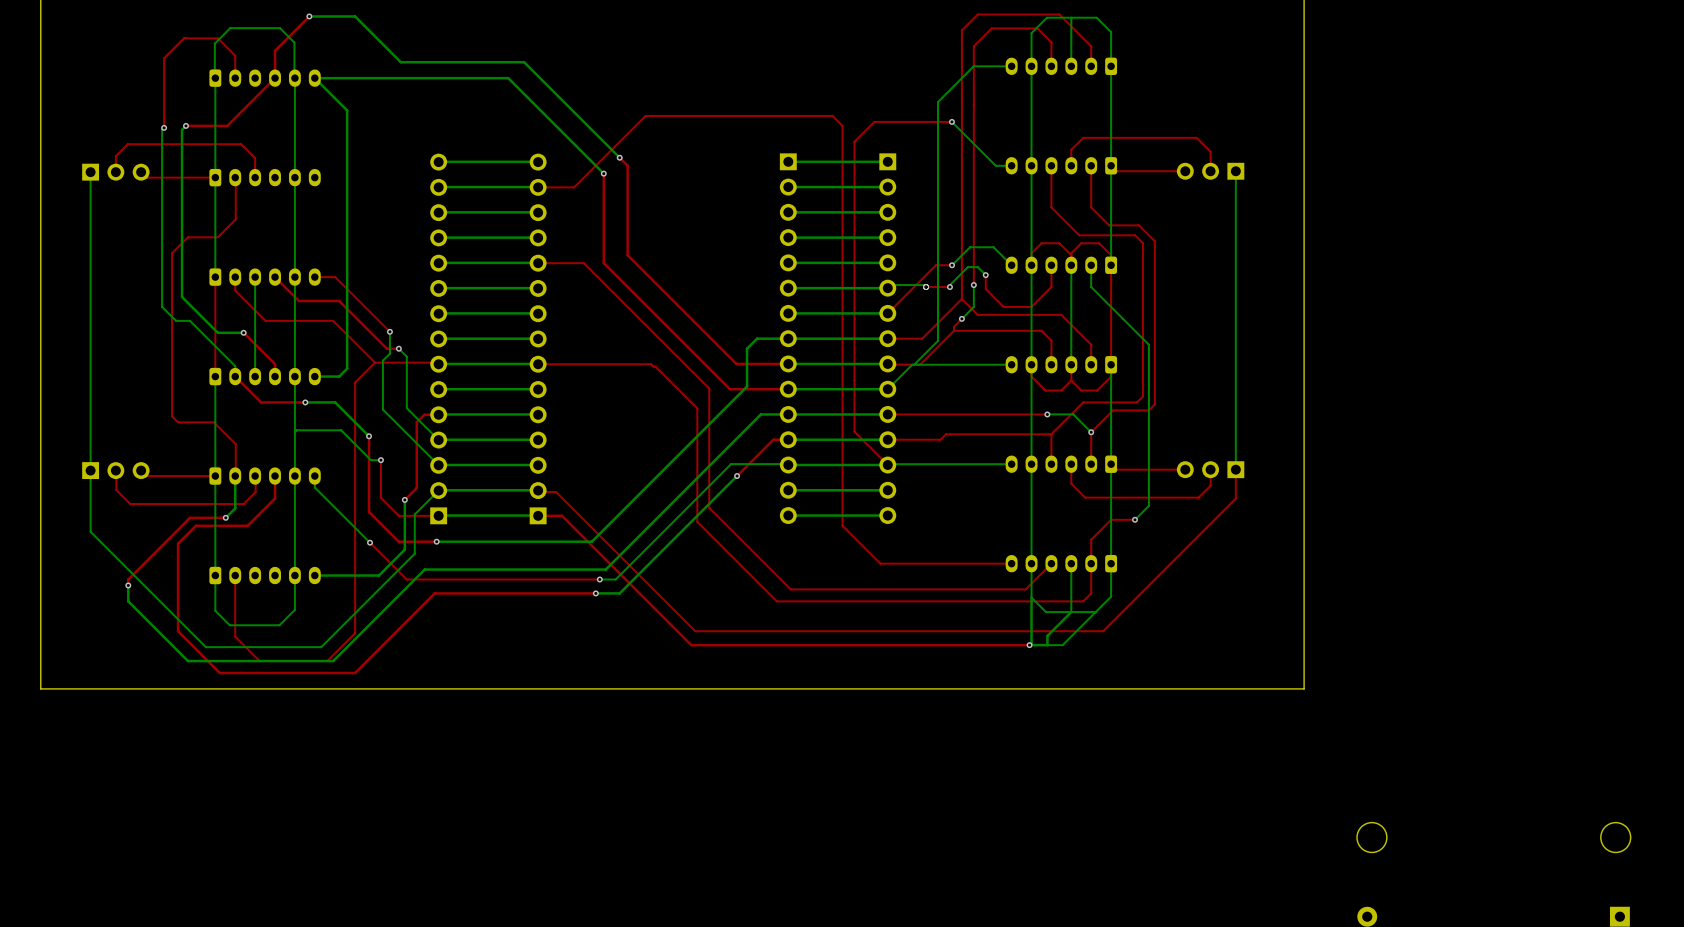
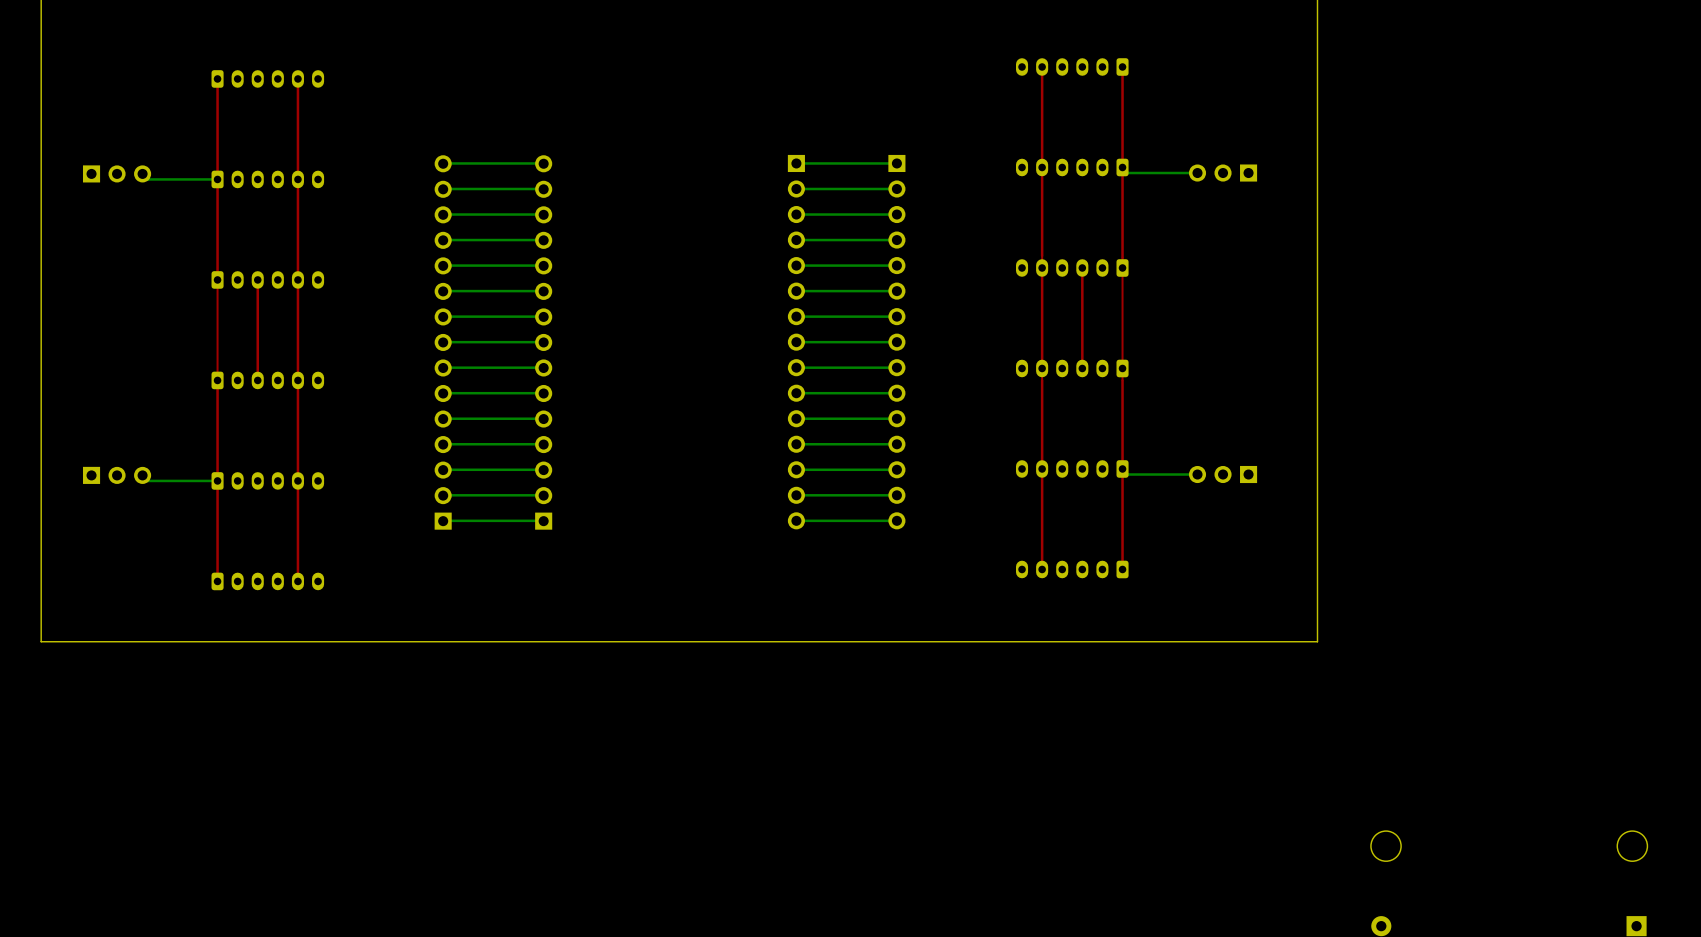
bottom track: (309, 16) (355, 16) (400, 62) (524, 62) (619, 157) -> none
top track: (309, 16) (275, 50) (275, 78) (227, 125) (186, 125) -> none
via: (309, 16) -> none
bottom track: (1071, 17) (1071, 66) -> none
bottom track: (1011, 66) (973, 66) (938, 102) (938, 340) (914, 364) -> none
top track: (1051, 66) (1051, 42) (1037, 28) (991, 28) (973, 46) (973, 285) -> none
top track: (1091, 66) (1091, 46) (1059, 14) (977, 14) (961, 30) (961, 298) -> none
bottom track: (294, 77) (294, 42) (280, 28) (230, 28) (214, 43) (214, 77) -> none
bottom track: (215, 78) (215, 277) -> none
top track: none -> (217, 78) (217, 279)
top track: (235, 78) (235, 55) (217, 38) (184, 38) (164, 58) (164, 127) -> none
bottom track: (294, 78) (294, 609) (279, 625) (229, 625) (215, 610) (215, 376) -> none
top track: none -> (297, 78) (297, 581)
bottom track: (951, 121) (995, 165) (1011, 165) -> none
top track: (951, 121) (874, 121) (854, 141) (854, 431) (887, 465) -> none
via: (951, 121) -> none
bottom track: (186, 125) (182, 129) (182, 296) (217, 332) (243, 332) -> none
via: (186, 125) -> none
bottom track: (164, 127) (162, 129) (162, 306) (176, 320) (189, 320) (235, 366) (235, 376) -> none
via: (164, 127) -> none
top track: (619, 157) (627, 165) (627, 255) (736, 363) (788, 363) -> none
via: (619, 157) -> none
top track: (1051, 165) (1051, 207) (1079, 235) (1134, 235) (1142, 243) (1142, 396) (1136, 402) (1083, 402) (1051, 434) -> none
top track: (1071, 165) (1071, 149) (1083, 137) (1196, 137) (1210, 151) (1210, 171) -> none
top track: (1091, 165) (1091, 207) (1109, 225) (1138, 225) (1154, 241) (1154, 404) (1148, 410) (1113, 410) (1091, 432) (1091, 464) -> none
bottom track: none -> (1197, 173) (1128, 173)
top track: (1185, 171) (1116, 171) -> none
bottom track: (1235, 171) (1235, 469) -> none
bottom track: (90, 172) (90, 531) (205, 647) (321, 647) (414, 553) (414, 514) (438, 490) -> none
top track: (115, 172) (115, 156) (127, 144) (241, 144) (255, 158) (255, 177) -> none
top track: (141, 172) (146, 177) (215, 177) -> none
bottom track: (603, 173) (508, 78) (314, 78) (347, 110) (347, 368) (339, 376) (314, 376) -> none
top track: (603, 173) (603, 263) (729, 389) (788, 389) -> none
via: (603, 173) -> none
bottom track: none -> (217, 179) (148, 179)
top track: (235, 177) (235, 219) (217, 237) (187, 237) (172, 253) (172, 416) (178, 422) (213, 422) (235, 444) (235, 476) -> none
top track: (538, 187) (574, 187) (645, 115) (832, 115) (842, 125) (842, 525) (880, 563) (1011, 563) -> none
top track: (1031, 253) (1041, 243) (1059, 243) (1071, 255) -> (1042, 255) (1042, 66)
top track: (1111, 255) (1099, 243) (1081, 243) (1071, 253) (1071, 265) -> (1122, 257) (1122, 66)
top track: (538, 263) (583, 263) (709, 388) (709, 507) (790, 589) (1025, 589) (1051, 563) -> none
top track: (952, 265) (935, 265) (887, 313) -> none
via: (952, 265) -> none
bottom track: (1011, 265) (993, 247) (970, 247) (952, 265) -> none
top track: none -> (1042, 267) (1042, 368)
top track: (1051, 265) (1051, 287) (1031, 306) (1003, 306) (985, 289) (985, 275) -> none
bottom track: (1071, 265) (1071, 364) -> none
bottom track: (1091, 265) (1091, 287) (1148, 344) (1148, 505) (1134, 519) -> none
bottom track: (1111, 265) (1111, 32) (1096, 17) (1046, 17) (1031, 33) (1031, 597) -> none
bottom track: (985, 275) (977, 267) (967, 267) (947, 287) -> none
via: (985, 275) -> none
top track: (235, 277) (235, 290) (265, 320) (333, 320) (375, 362) -> none
bottom track: (255, 277) (255, 376) -> none
top track: none -> (257, 279) (257, 380)
top track: (275, 277) (298, 300) (339, 300) (386, 348) (398, 348) -> none
top track: (314, 277) (335, 277) (389, 331) -> none
bottom track: (973, 285) (973, 306) (961, 318) -> none
via: (973, 285) -> none
bottom track: (926, 287) (924, 285) (890, 285) (887, 288) -> none
via: (926, 287) -> none
top track: (949, 287) (926, 287) -> none
via: (949, 287) -> none
top track: (961, 298) (922, 338) (887, 338) -> none
top track: (961, 298) (977, 314) (1061, 314) (1091, 344) (1091, 364) -> none
top track: (961, 318) (953, 326) (953, 330) -> none
via: (961, 318) -> none
top track: (953, 330) (1041, 330) (1051, 340) (1051, 364) -> none
top track: (953, 330) (920, 364) (887, 363) -> none
bottom track: (389, 331) (389, 353) (382, 360) (382, 409) (438, 465) -> none
via: (389, 331) -> none
top track: (243, 332) (275, 364) (275, 376) -> none
via: (243, 332) -> none
bottom track: (788, 345) (788, 338) (757, 338) (747, 348) (747, 386) (591, 541) (436, 541) -> none
bottom track: (398, 348) (406, 356) (406, 408) (438, 440) -> none
via: (398, 348) -> none
top track: (375, 362) (437, 362) (438, 364) -> none
top track: (375, 362) (355, 382) (355, 633) (327, 661) (259, 661) (235, 636) (235, 575) -> none
top track: (538, 364) (651, 364) (655, 366) (697, 408) (697, 521) (776, 601) (1083, 601) (1091, 593) (1091, 539) (1111, 519) (1134, 519) -> none
bottom track: (1011, 364) (912, 364) (887, 389) -> none
top track: (1071, 364) (1071, 380) -> (1082, 368) (1082, 267)
bottom track: (1111, 364) (1111, 596) (1062, 645) (1047, 645) -> none
top track: none -> (217, 380) (217, 581)
top track: (235, 376) (261, 402) (305, 402) -> none
top track: (1031, 376) (1045, 390) (1061, 390) (1071, 380) -> (1042, 380) (1042, 569)
top track: (1111, 376) (1097, 390) (1081, 390) (1071, 380) -> (1122, 380) (1122, 569)
bottom track: (305, 402) (335, 402) (369, 436) -> none
via: (305, 402) -> none
top track: (438, 414) (424, 414) (416, 422) (416, 487) (404, 499) -> none
bottom track: (788, 414) (760, 414) (605, 569) (424, 569) (333, 661) (187, 661) (128, 601) (128, 585) -> none
bottom track: (1047, 414) (1073, 414) (1091, 432) -> none
top track: (1047, 414) (887, 414) -> none
via: (1047, 414) -> none
bottom track: (294, 432) (296, 430) (341, 430) (371, 460) (380, 460) -> none
via: (1091, 432) -> none
top track: (1051, 434) (1051, 464) -> none
top track: (1051, 434) (945, 434) (940, 439) (887, 439) -> none
top track: (369, 436) (369, 511) (398, 541) (436, 541) -> none
via: (369, 436) -> none
top track: (788, 439) (773, 439) (737, 476) -> none
top track: (380, 460) (380, 497) (398, 515) (438, 515) -> none
via: (380, 460) -> none
bottom track: (1011, 464) (887, 465) -> none
top track: (1071, 464) (1071, 483) (1085, 497) (1198, 497) (1210, 485) (1210, 469) -> none
bottom track: (788, 465) (731, 464) (615, 579) (599, 579) -> none
bottom track: none -> (1197, 474) (1128, 474)
top track: (1185, 469) (1116, 469) -> none
top track: (1235, 469) (1235, 498) (1103, 631) (695, 631) (556, 491) (538, 490) -> none
top track: (116, 470) (116, 490) (130, 504) (243, 504) (255, 492) (255, 476) -> none
top track: (141, 470) (146, 476) (215, 476) -> none
bottom track: none -> (217, 480) (148, 480)
bottom track: (235, 476) (235, 508) (225, 517) -> none
top track: (275, 476) (275, 498) (247, 525) (195, 525) (178, 543) (178, 631) (219, 673) (355, 673) (434, 593) (595, 593) -> none
bottom track: (314, 476) (314, 487) (370, 542) -> none
bottom track: (737, 476) (619, 593) (595, 593) -> none
via: (737, 476) -> none
bottom track: (404, 499) (404, 549) (378, 575) (314, 575) -> none
via: (404, 499) -> none
top track: (538, 515) (562, 515) (691, 645) (1029, 645) -> none
top track: (225, 517) (189, 517) (128, 579) (128, 585) -> none
via: (225, 517) -> none
via: (1134, 519) -> none
via: (436, 541) -> none
top track: (370, 542) (406, 579) (599, 579) -> none
via: (370, 542) -> none
bottom track: (1071, 563) (1071, 612) (1047, 635) (1047, 645) -> none
via: (599, 579) -> none
via: (128, 585) -> none
via: (595, 593) -> none
bottom track: (1031, 597) (1031, 643) (1029, 645) (1047, 645) -> none
bottom track: (1031, 597) (1045, 612) (1095, 612) -> none
board edge: (1304, 635) (1304, 688) (40, 688) (40, 635) -> (1317, 641) (41, 641)
via: (1029, 645) -> none

